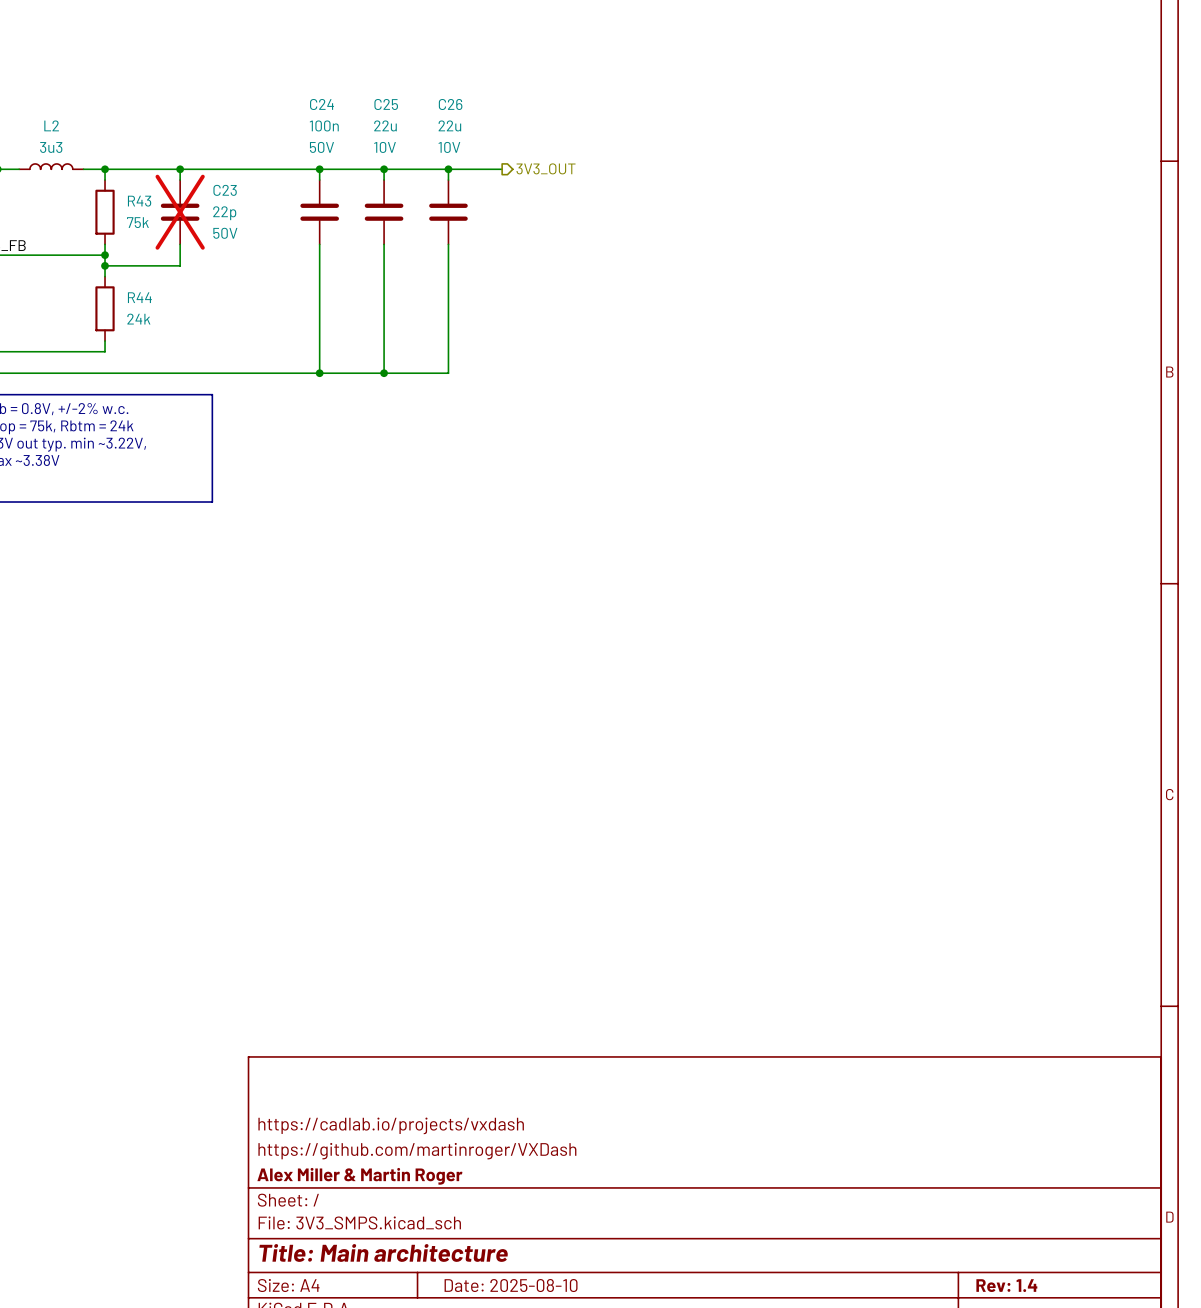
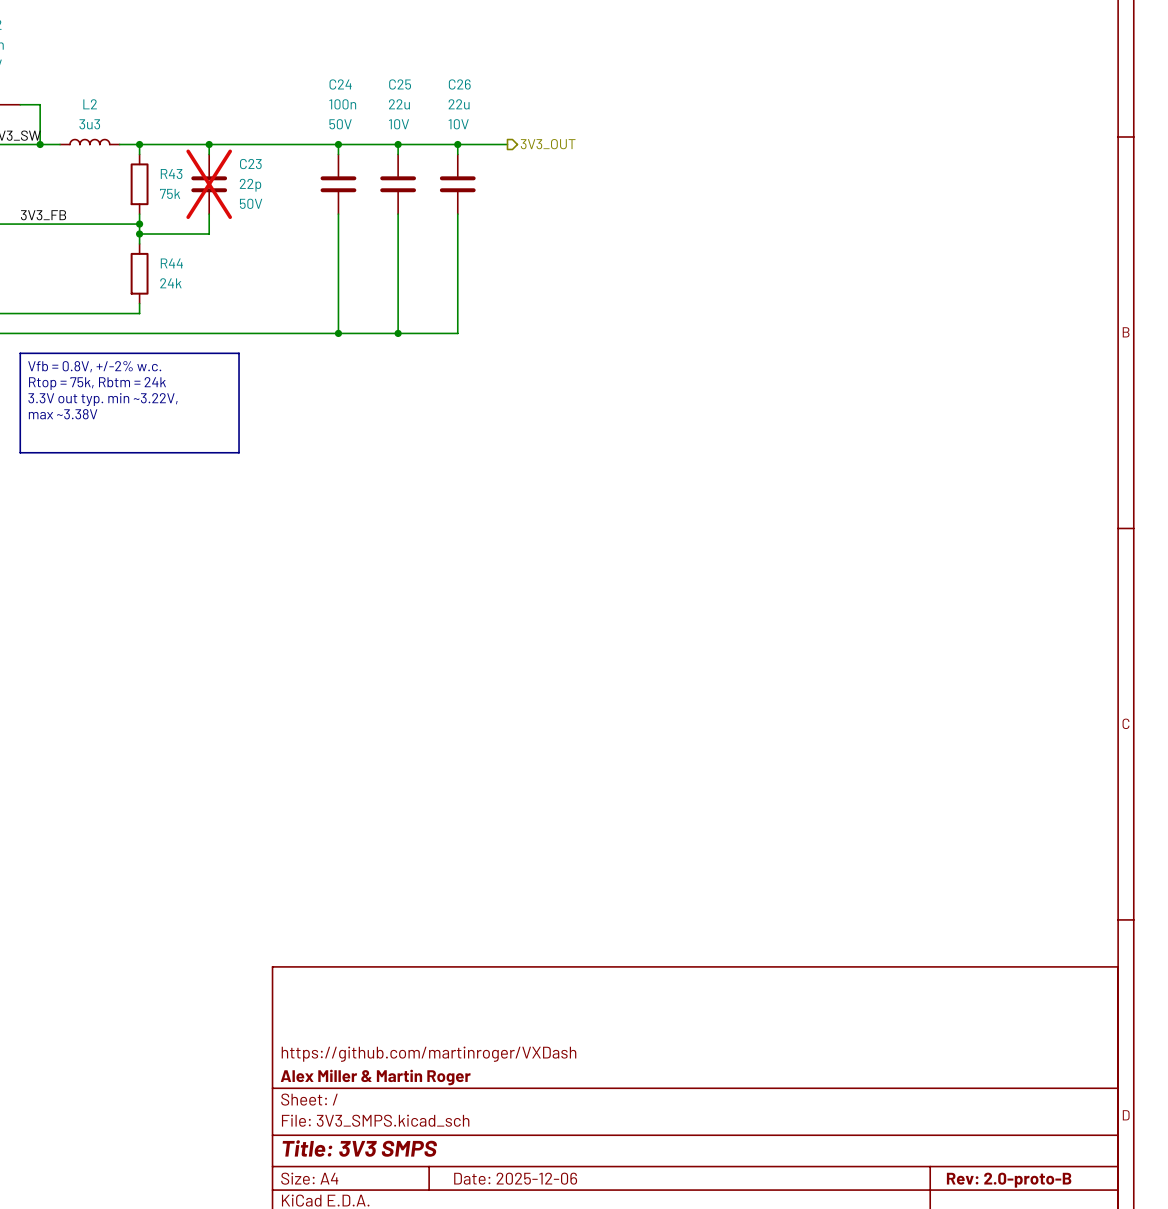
title block: https://cadlab.io/projects/vxdash (391, 1125) -> none
title block: Title: Main architecture (383, 1252) -> Title: 3V3 SMPS (359, 1148)
title block: Date: 2025-08-10 (511, 1285) -> Date: 2025-12-06 (515, 1178)
title block: Rev: 1.4 (1006, 1285) -> Rev: 2.0-proto-B (1009, 1180)

